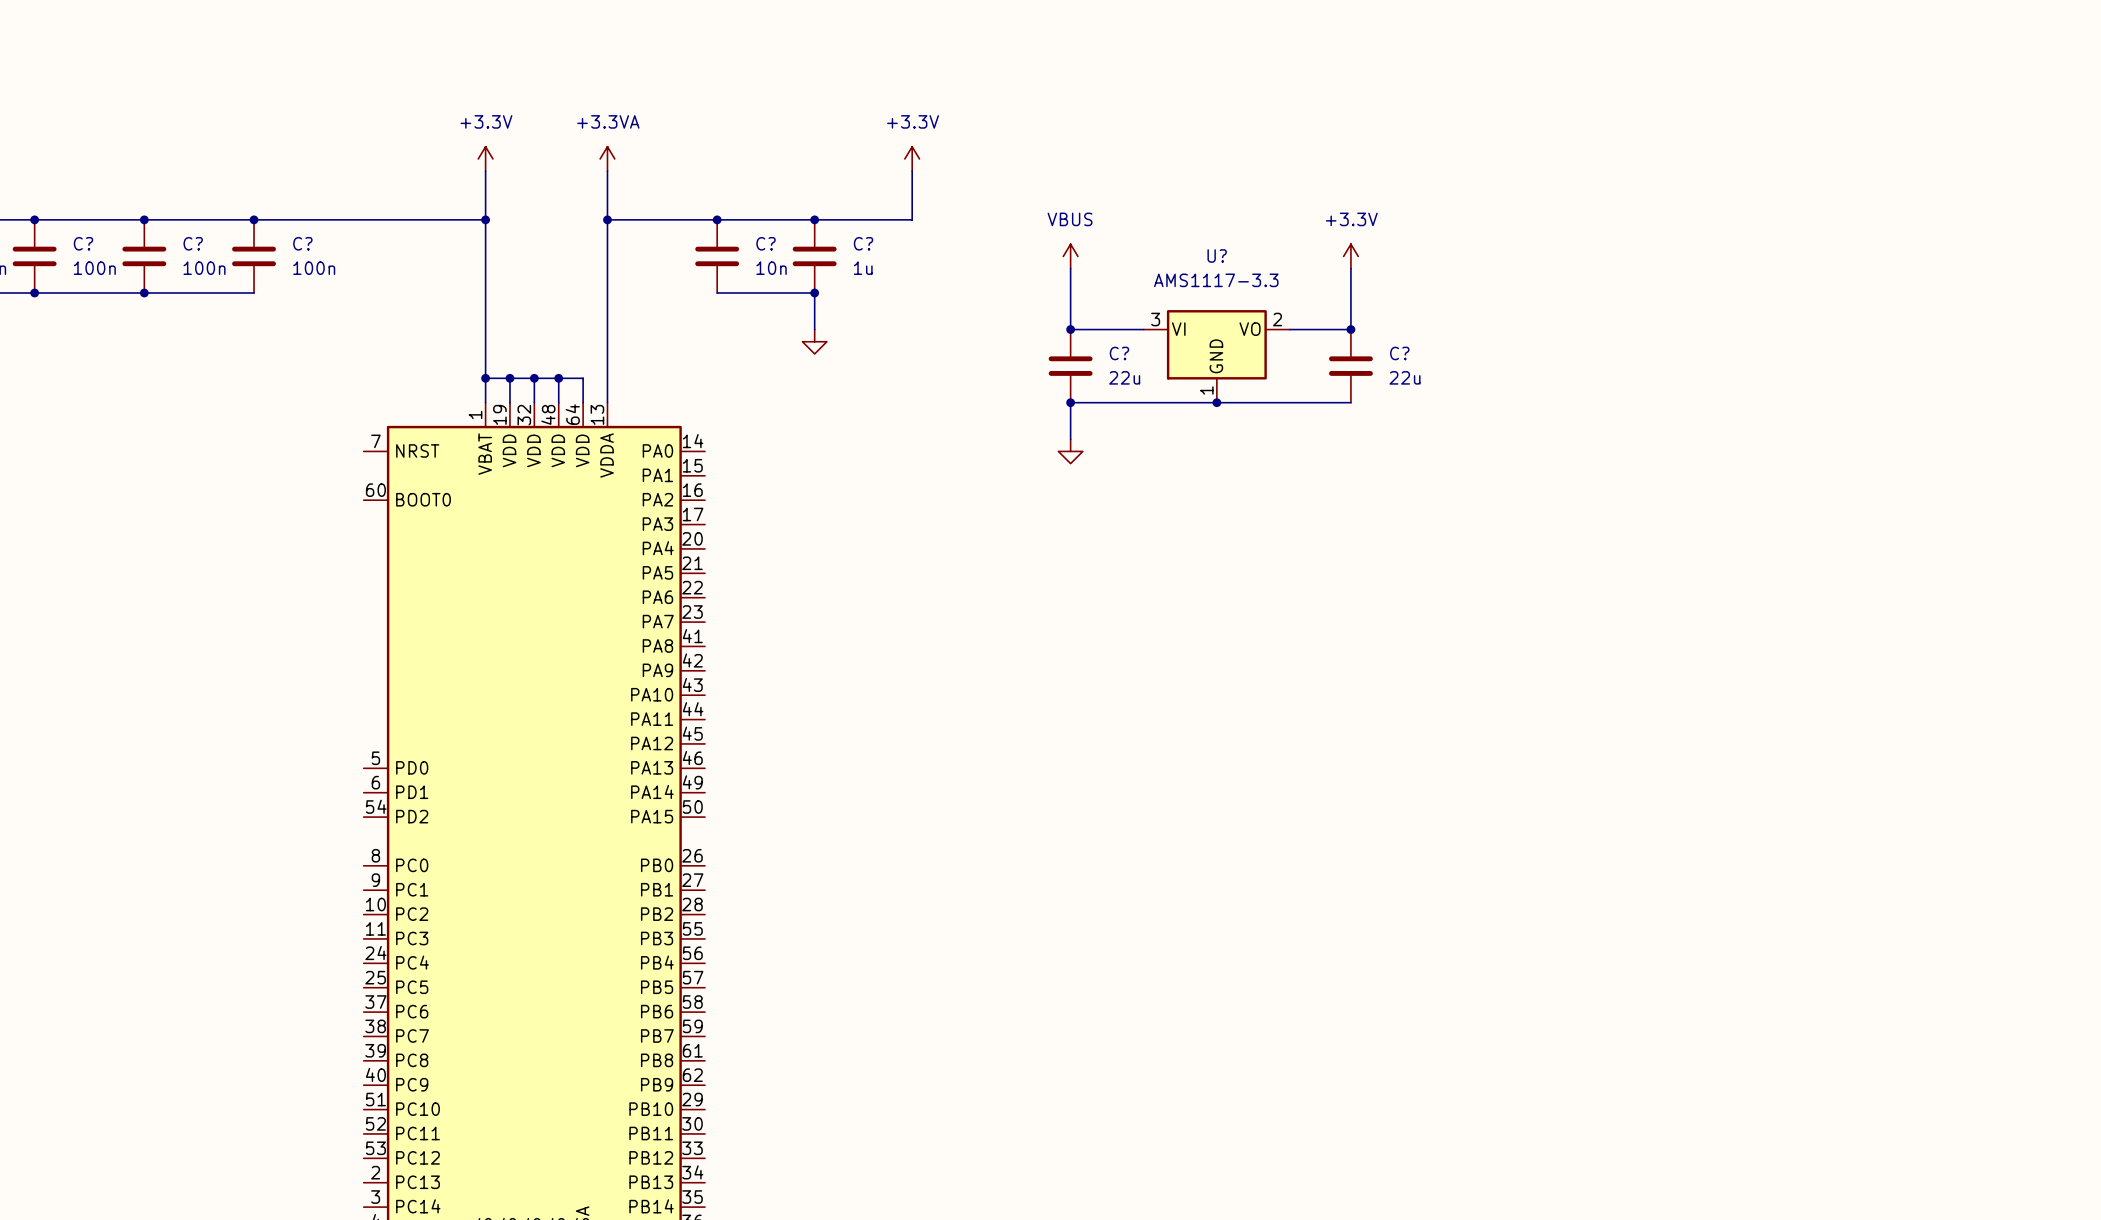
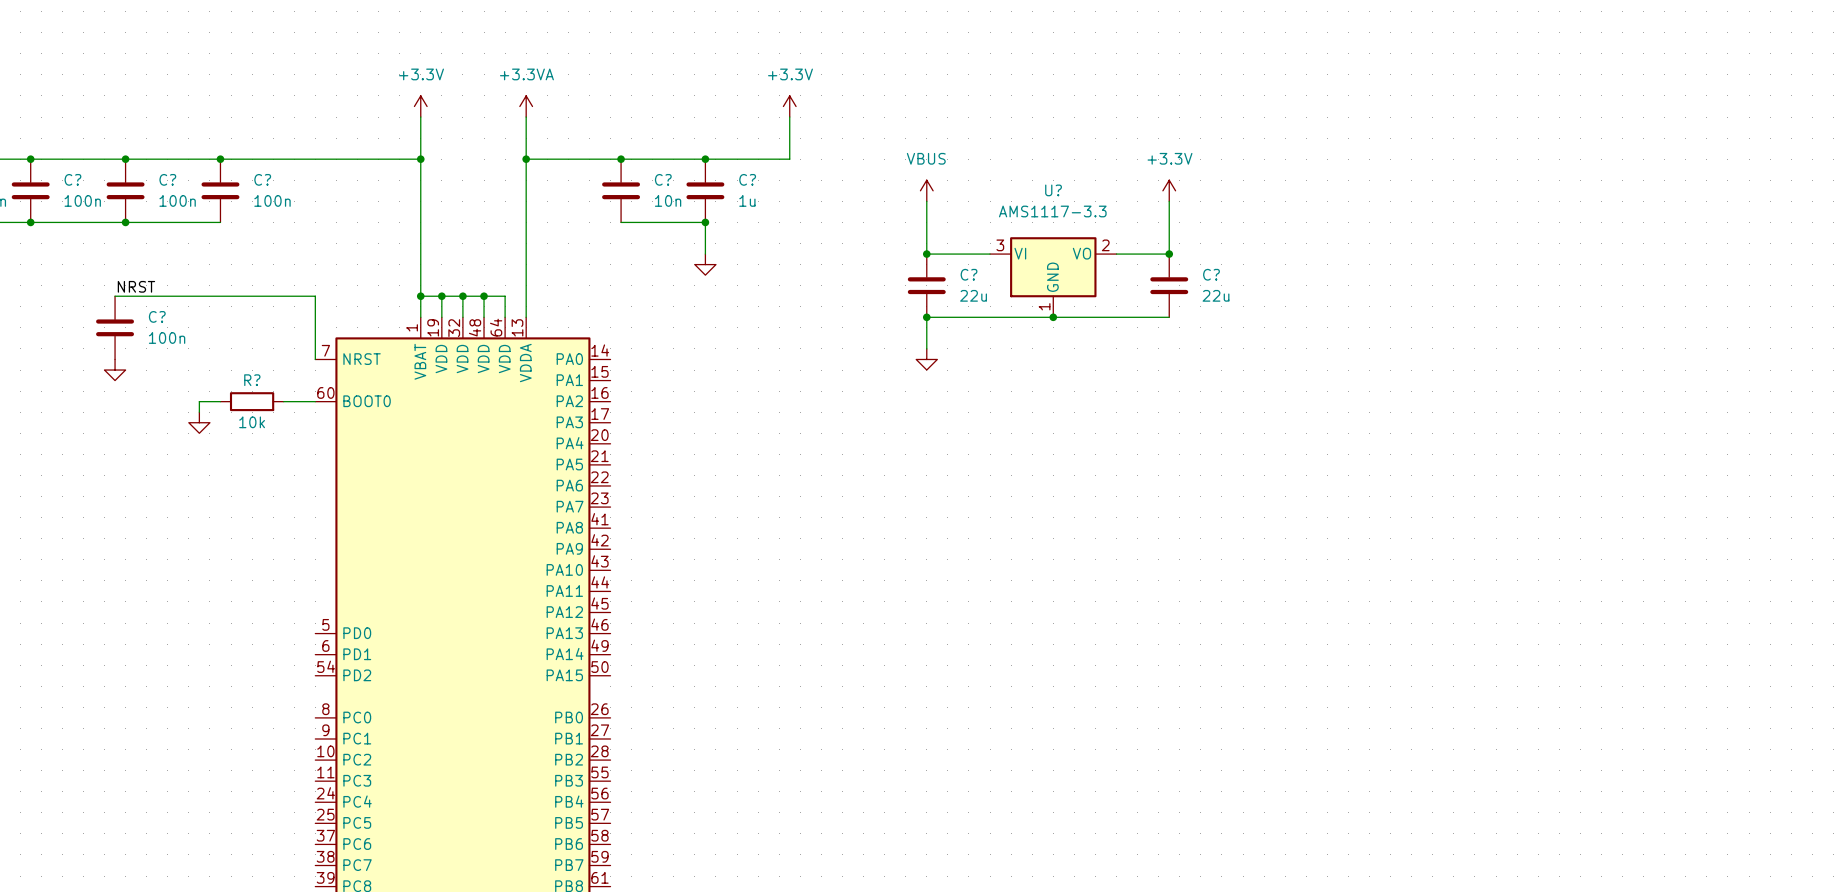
label: none -> NRST (136, 286)
wire: none -> (115, 296) (315, 296) (315, 359)
C?: none -> 100n (115, 327)
power symbol: none -> (115, 370)
wire: none -> (220, 401) (199, 401) (199, 412)
R?: none -> 10k (252, 401)
wire: none -> (283, 401) (315, 401)
power symbol: none -> (199, 422)

